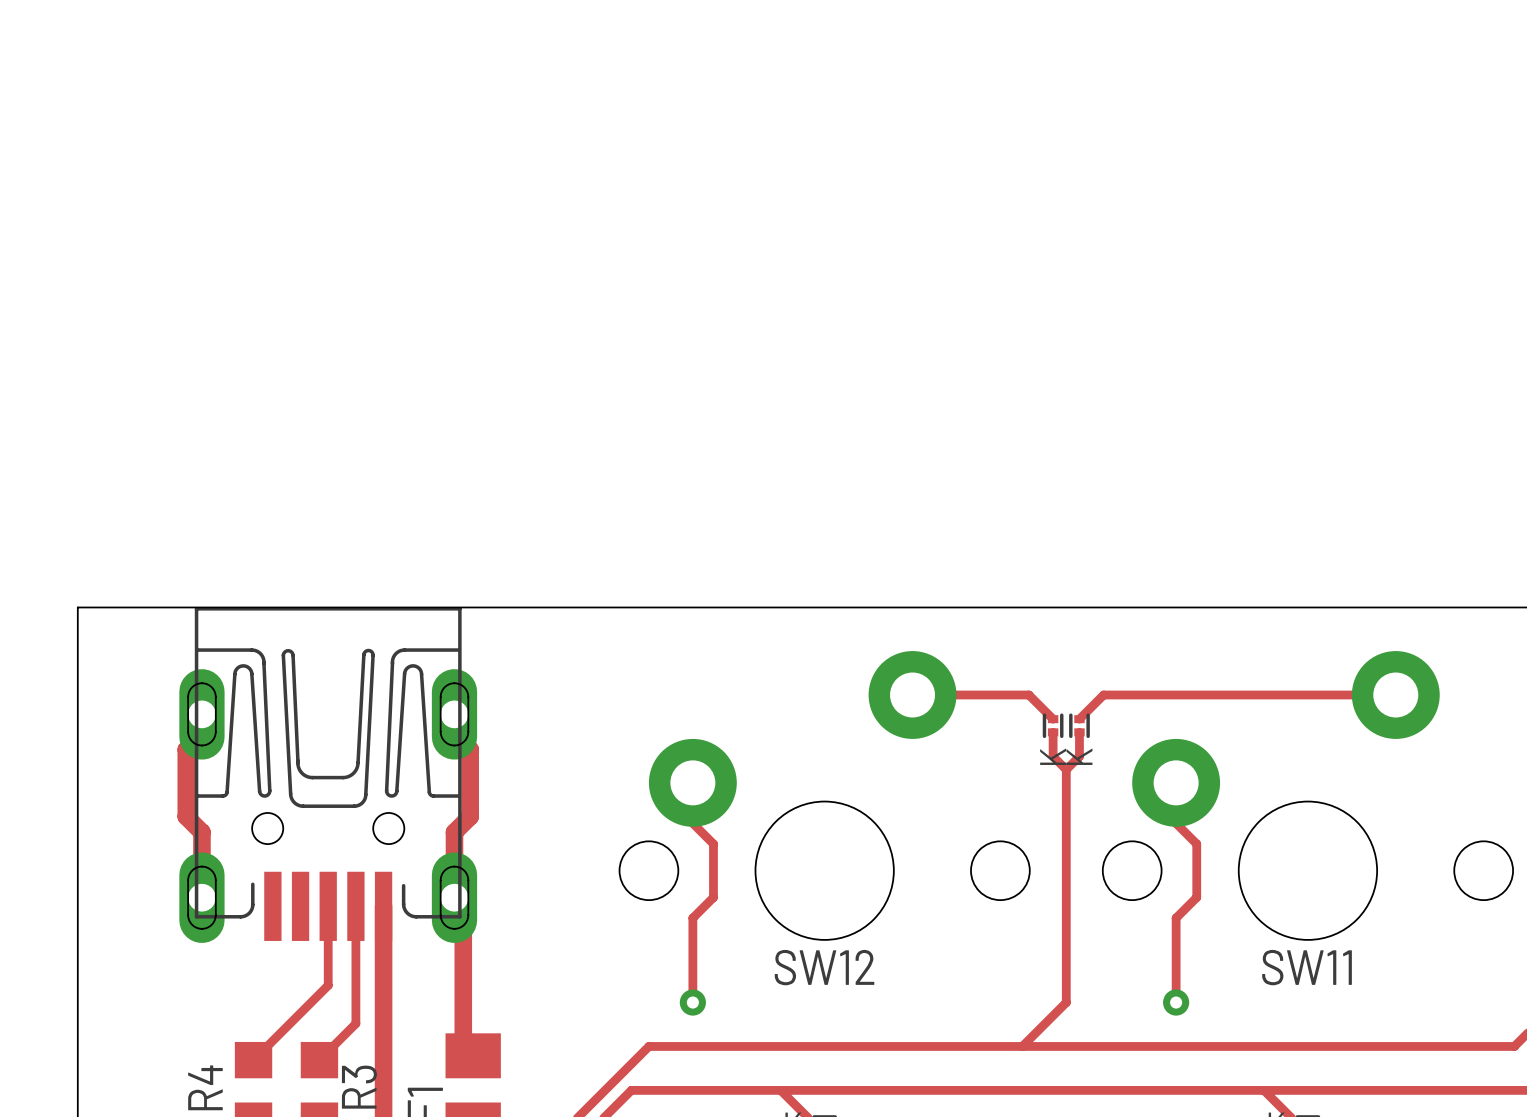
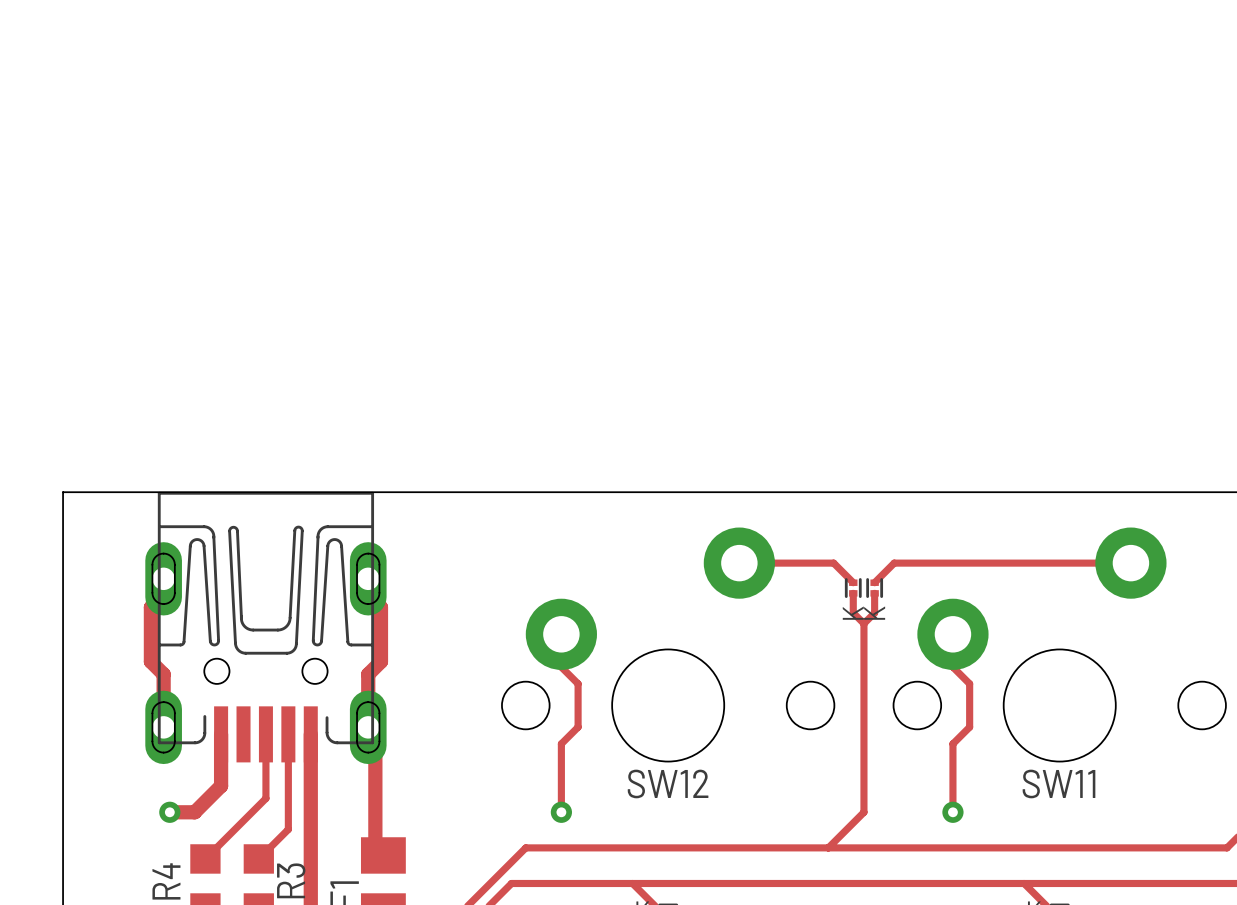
track: none -> (221, 734) (221, 785) (194, 812) (169, 812)
via: none -> (169, 812)

